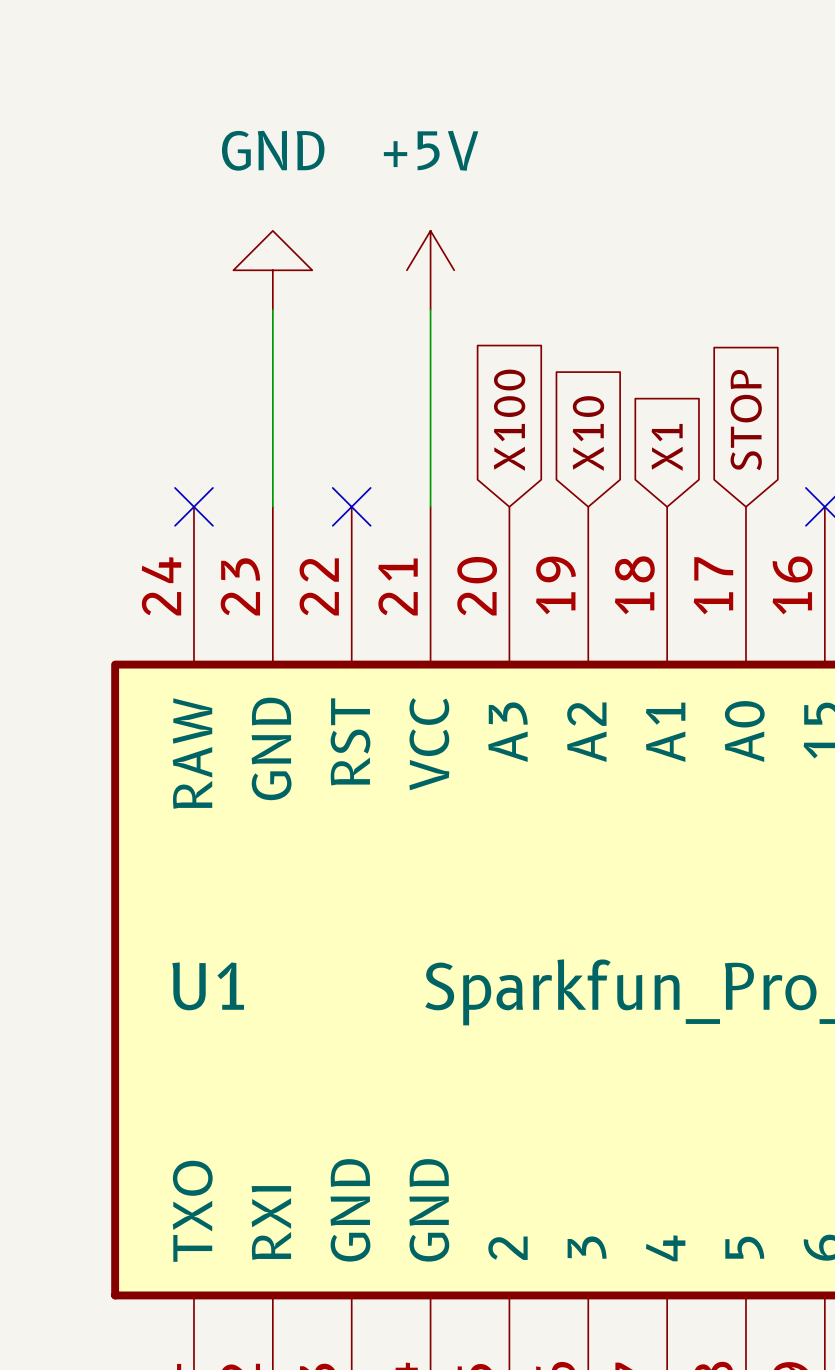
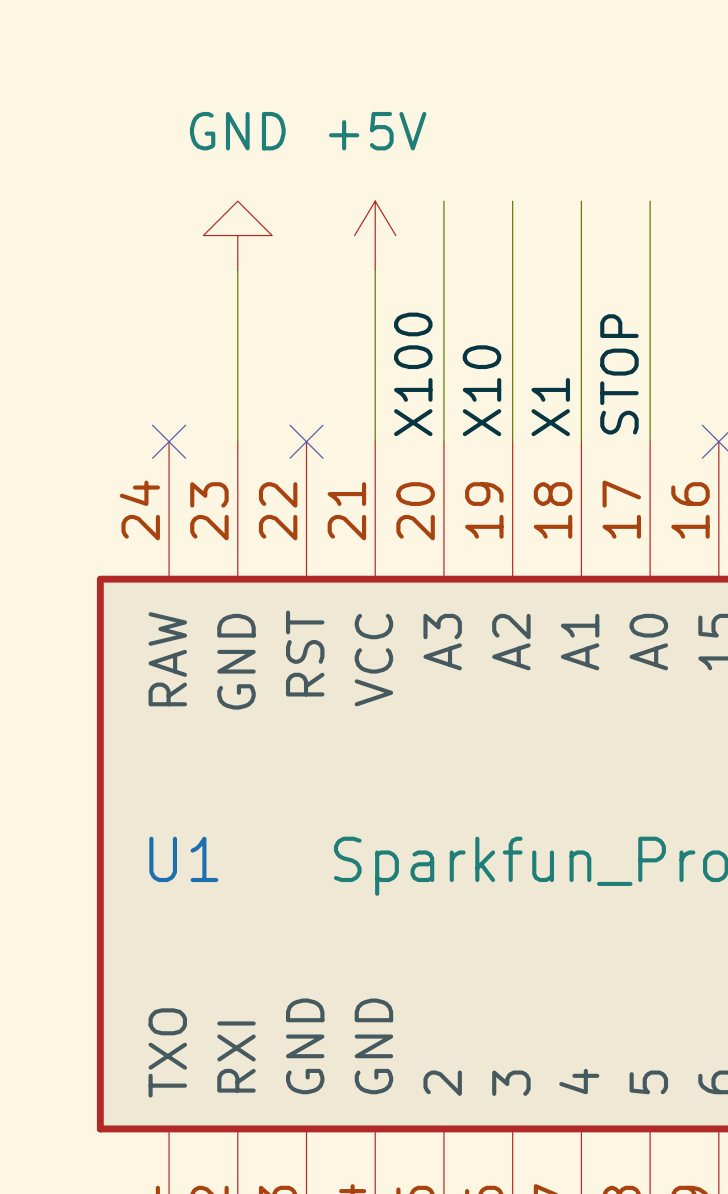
wire: none -> (443, 201) (443, 441)
wire: none -> (512, 201) (512, 441)
wire: none -> (581, 201) (581, 441)
wire: none -> (650, 201) (650, 441)
global label: X100 (509, 420) -> none
global label: STOP (746, 420) -> none
global label: X10 (588, 433) -> none
label: none -> X100 (413, 374)
label: none -> STOP (619, 374)
global label: X1 (667, 447) -> none
label: none -> X10 (482, 390)
label: none -> X1 (550, 407)

